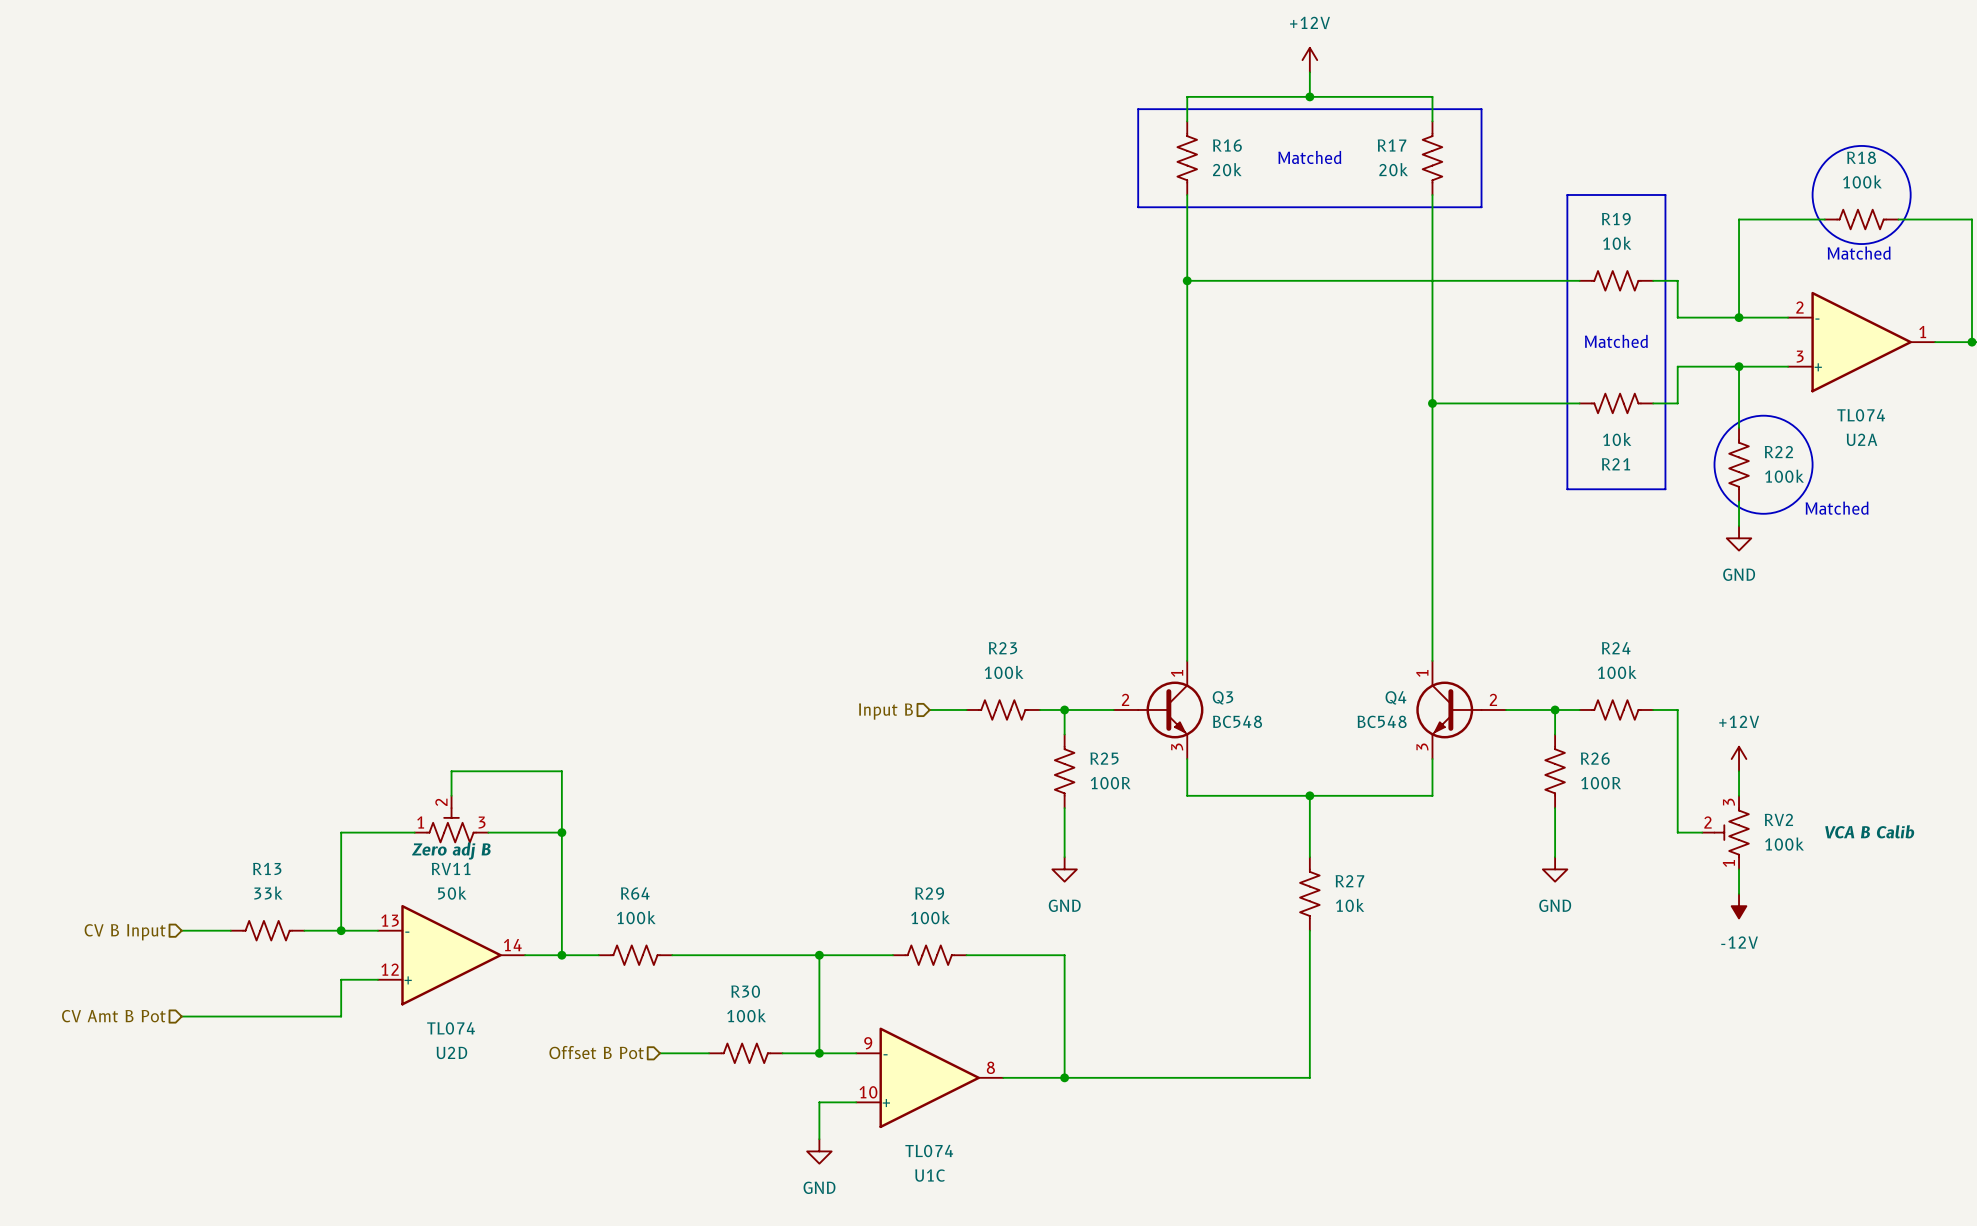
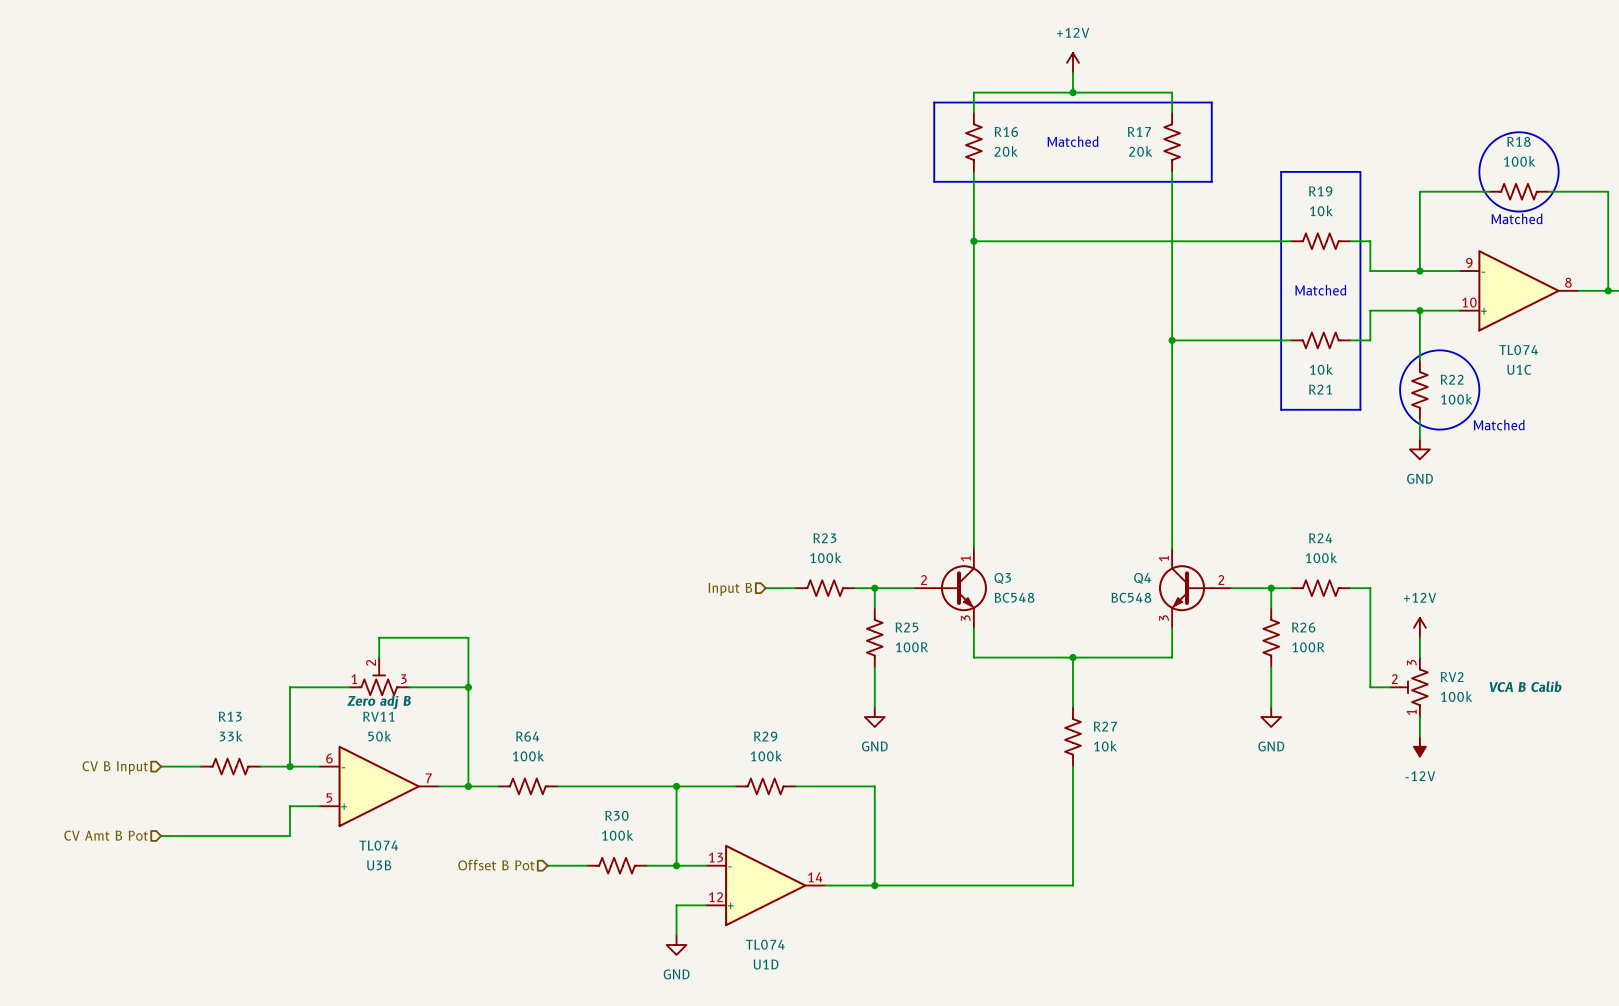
U2A: TL074 (1861, 342) -> none
U2D pin number: 13 (390, 920) -> 6 (329, 758)
U2D pin number: 14 (512, 945) -> 7 (428, 778)
U2D pin number: 12 (390, 969) -> 5 (329, 798)
U2D name: U2D (451, 1052) -> U3B (379, 865)
U1C position: (929, 1077) -> (1519, 290)
U1D: none -> TL074 (765, 885)

